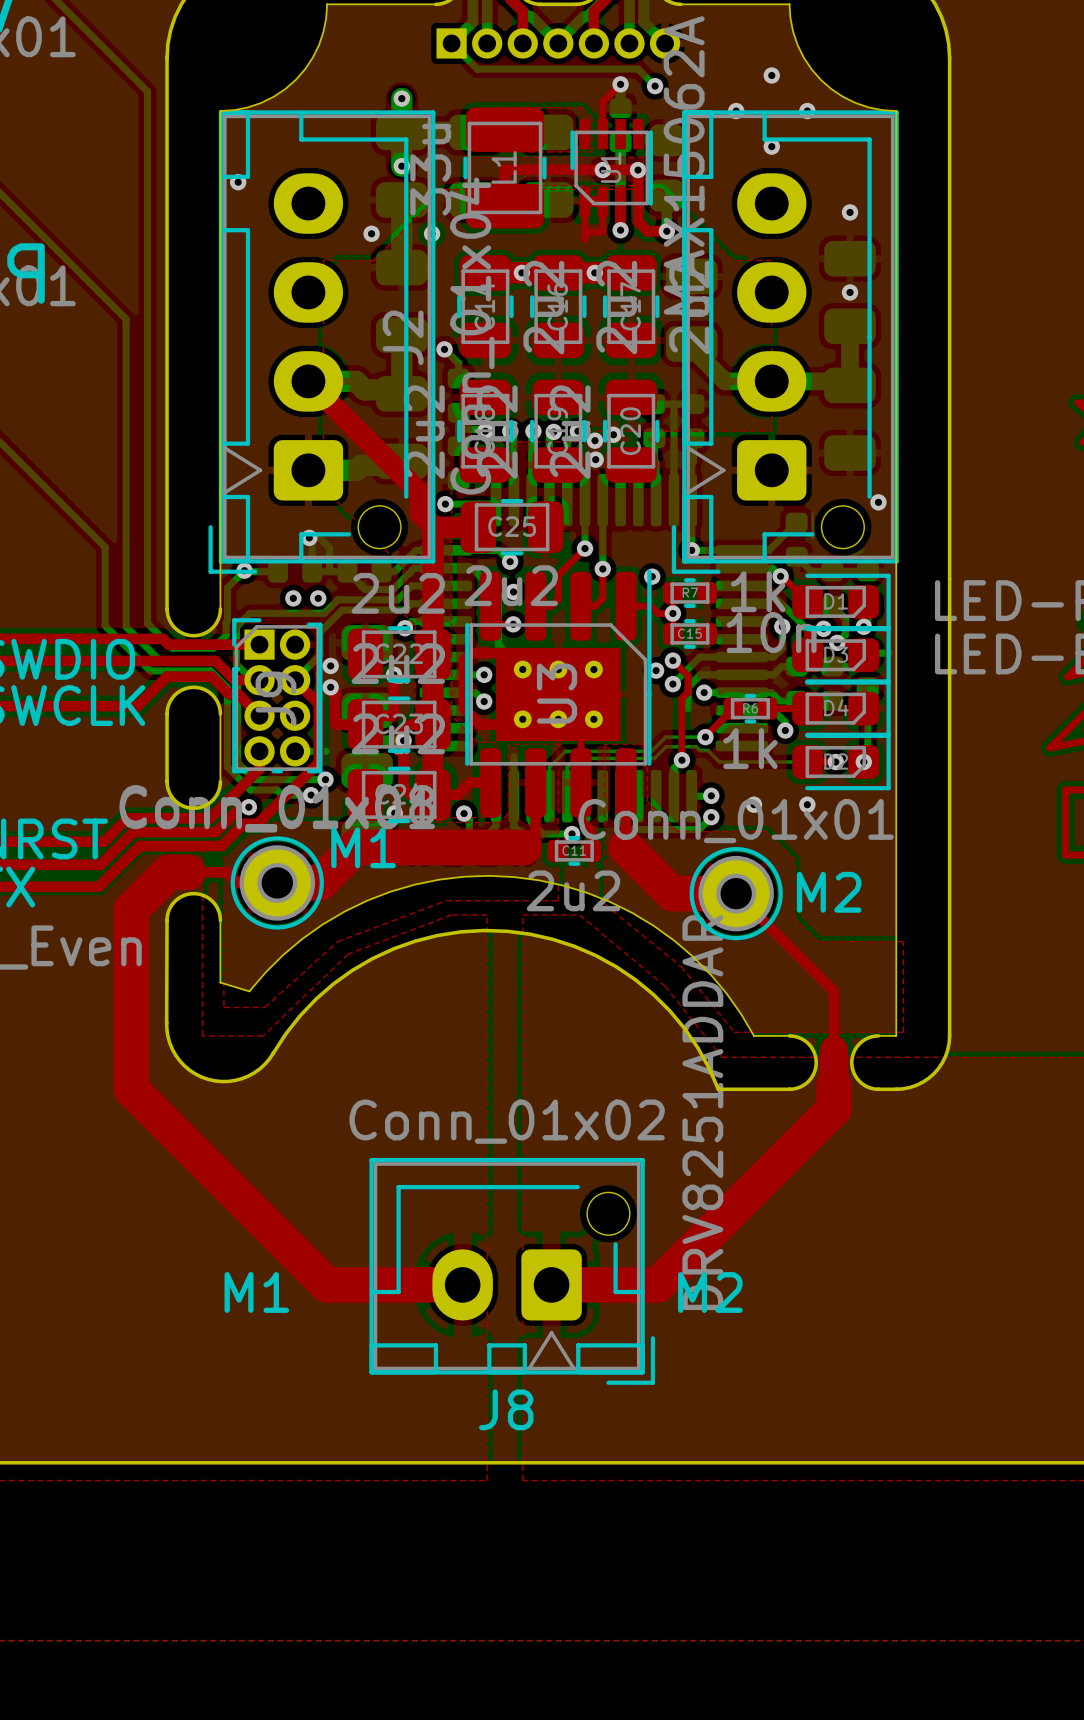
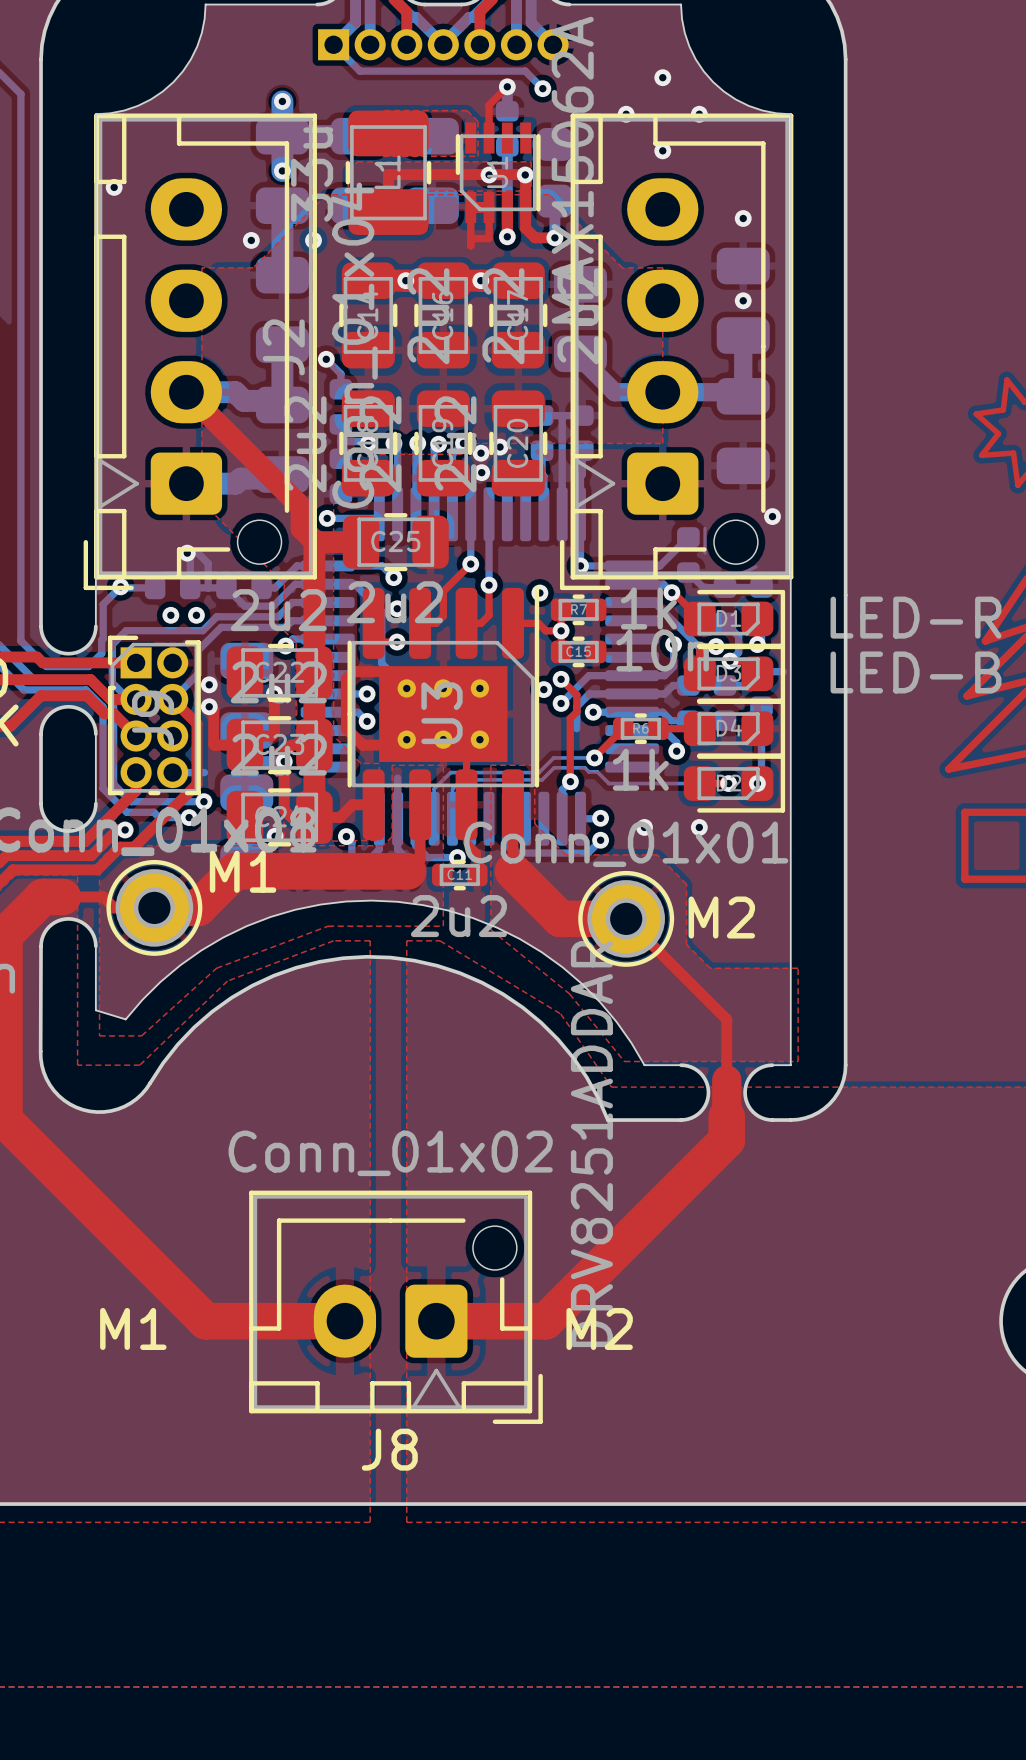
top zone outline: (555, 914) (579, 914) (665, 986) (721, 1057) -> (439, 940) (560, 1013) (611, 1087)

